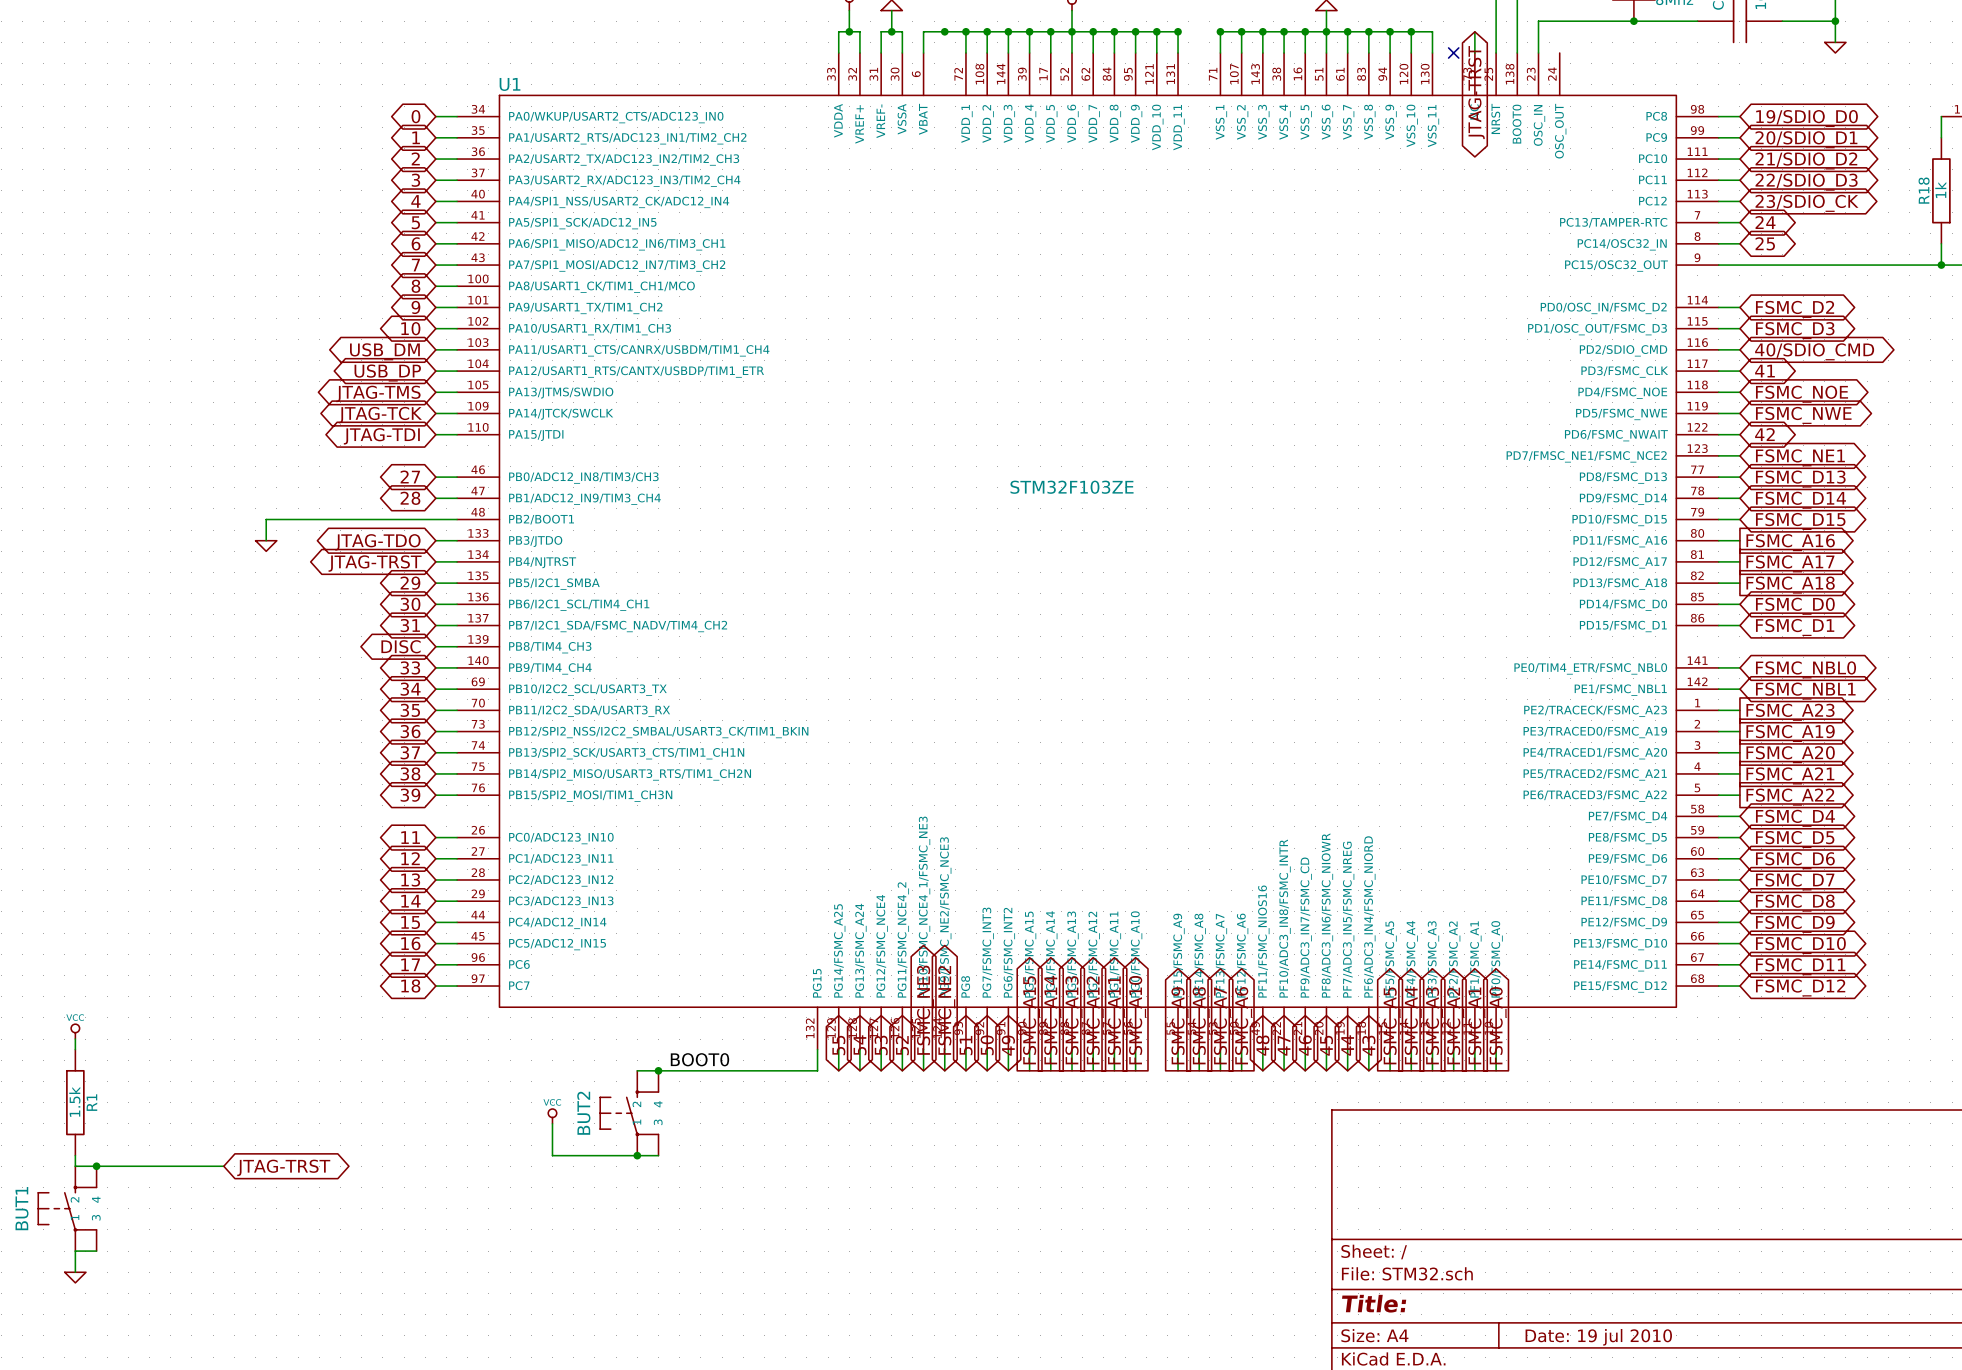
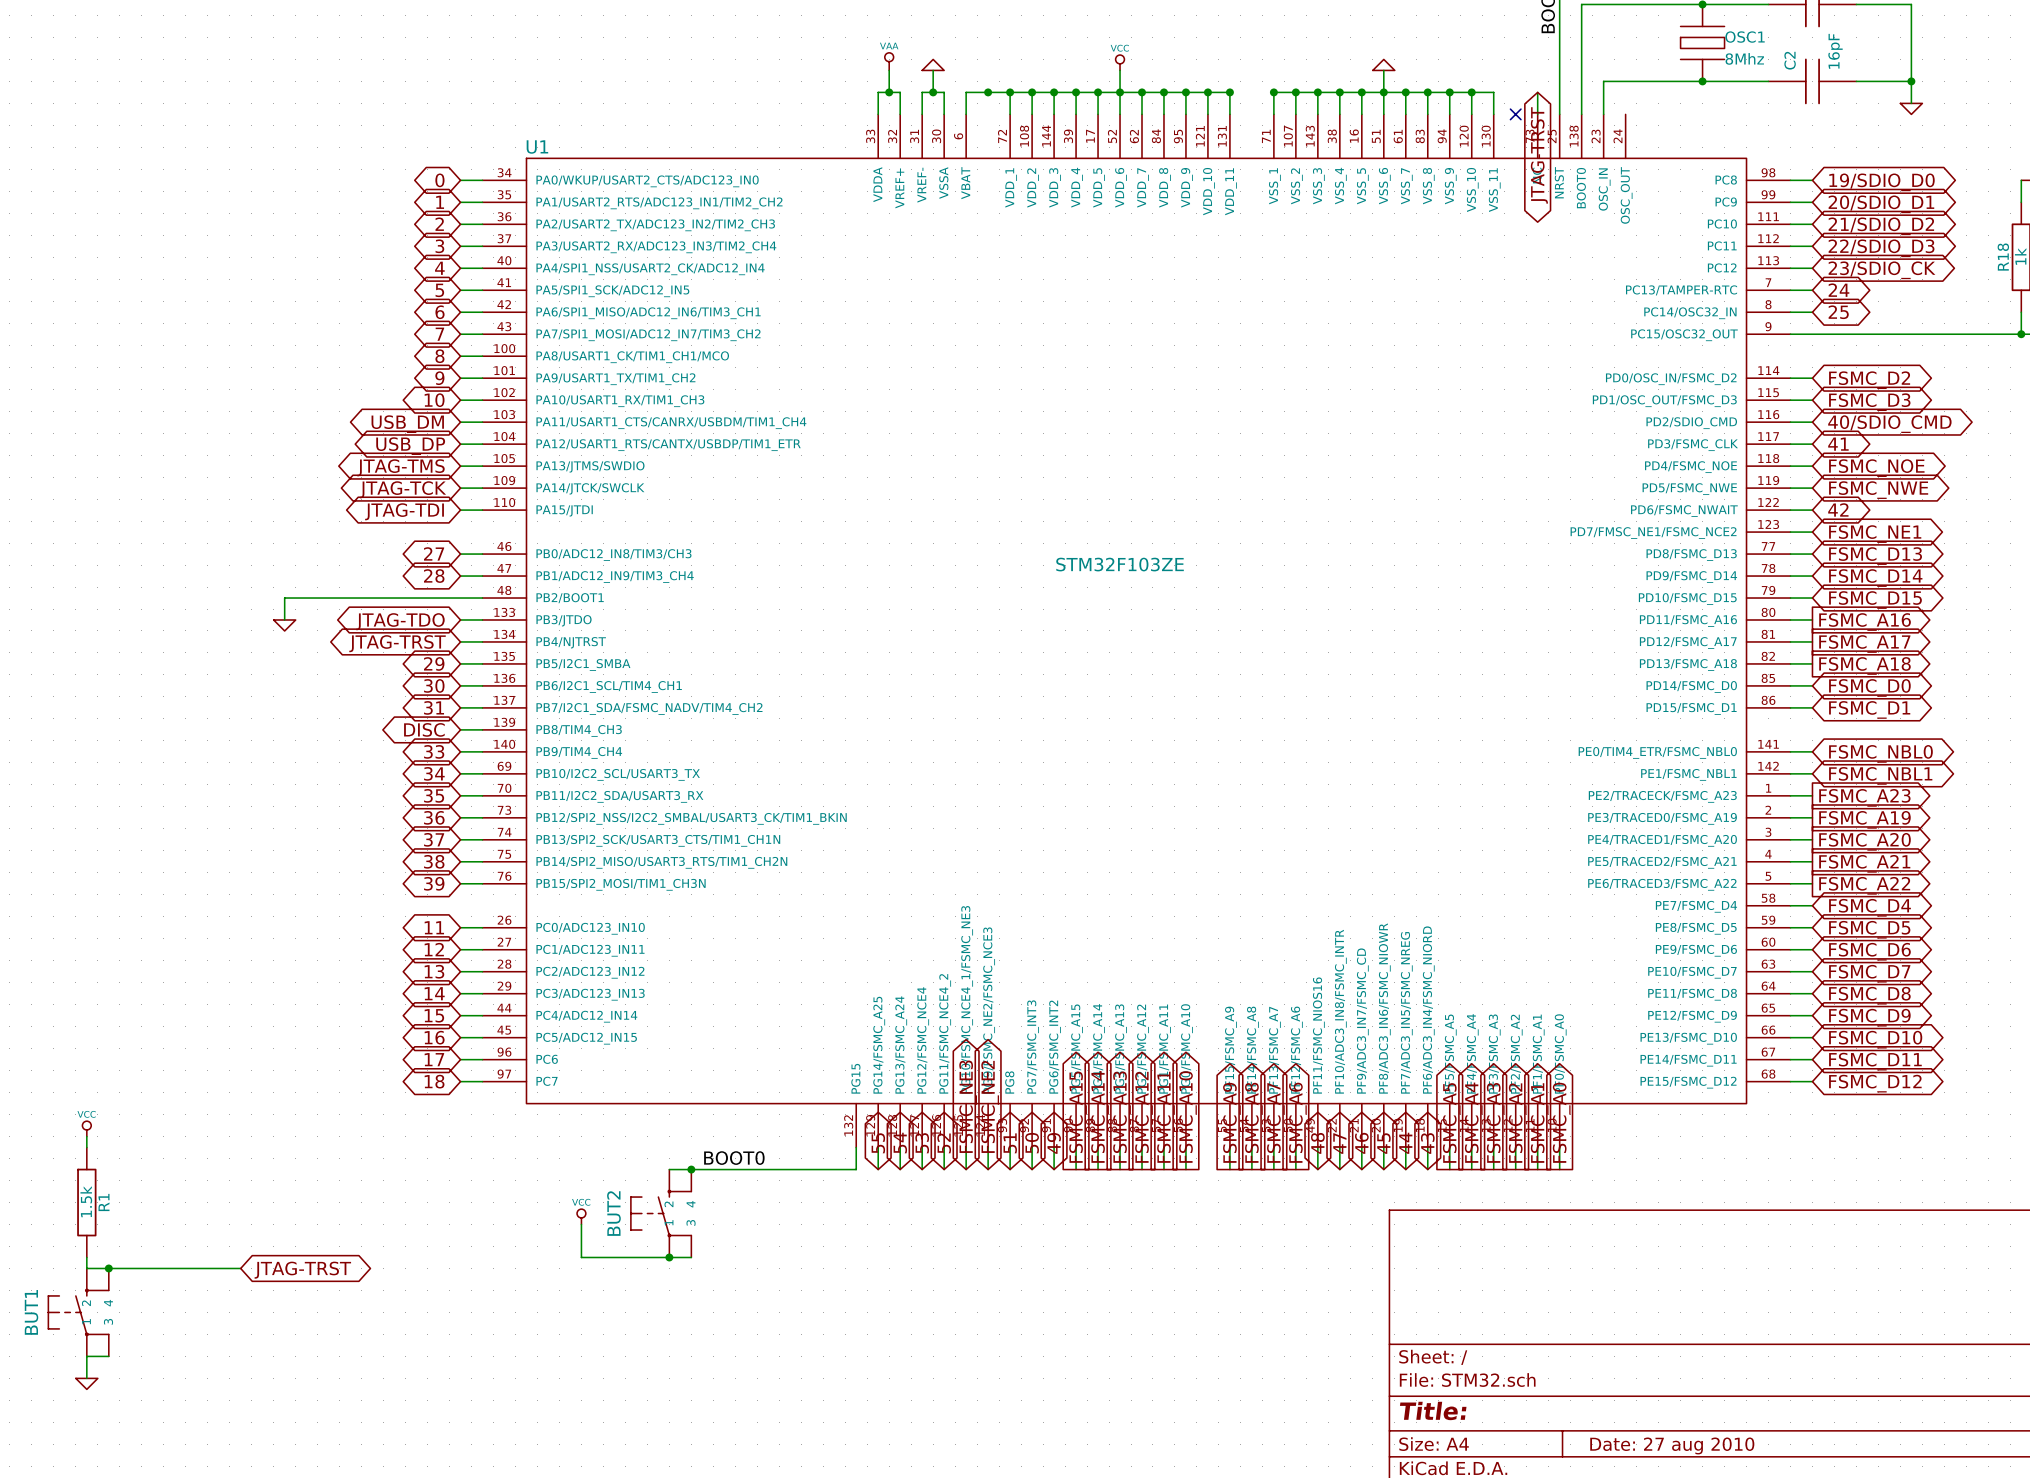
title block: Date: 19 jul 2010 (1598, 1337) -> Date: 27 aug 2010 (1672, 1445)

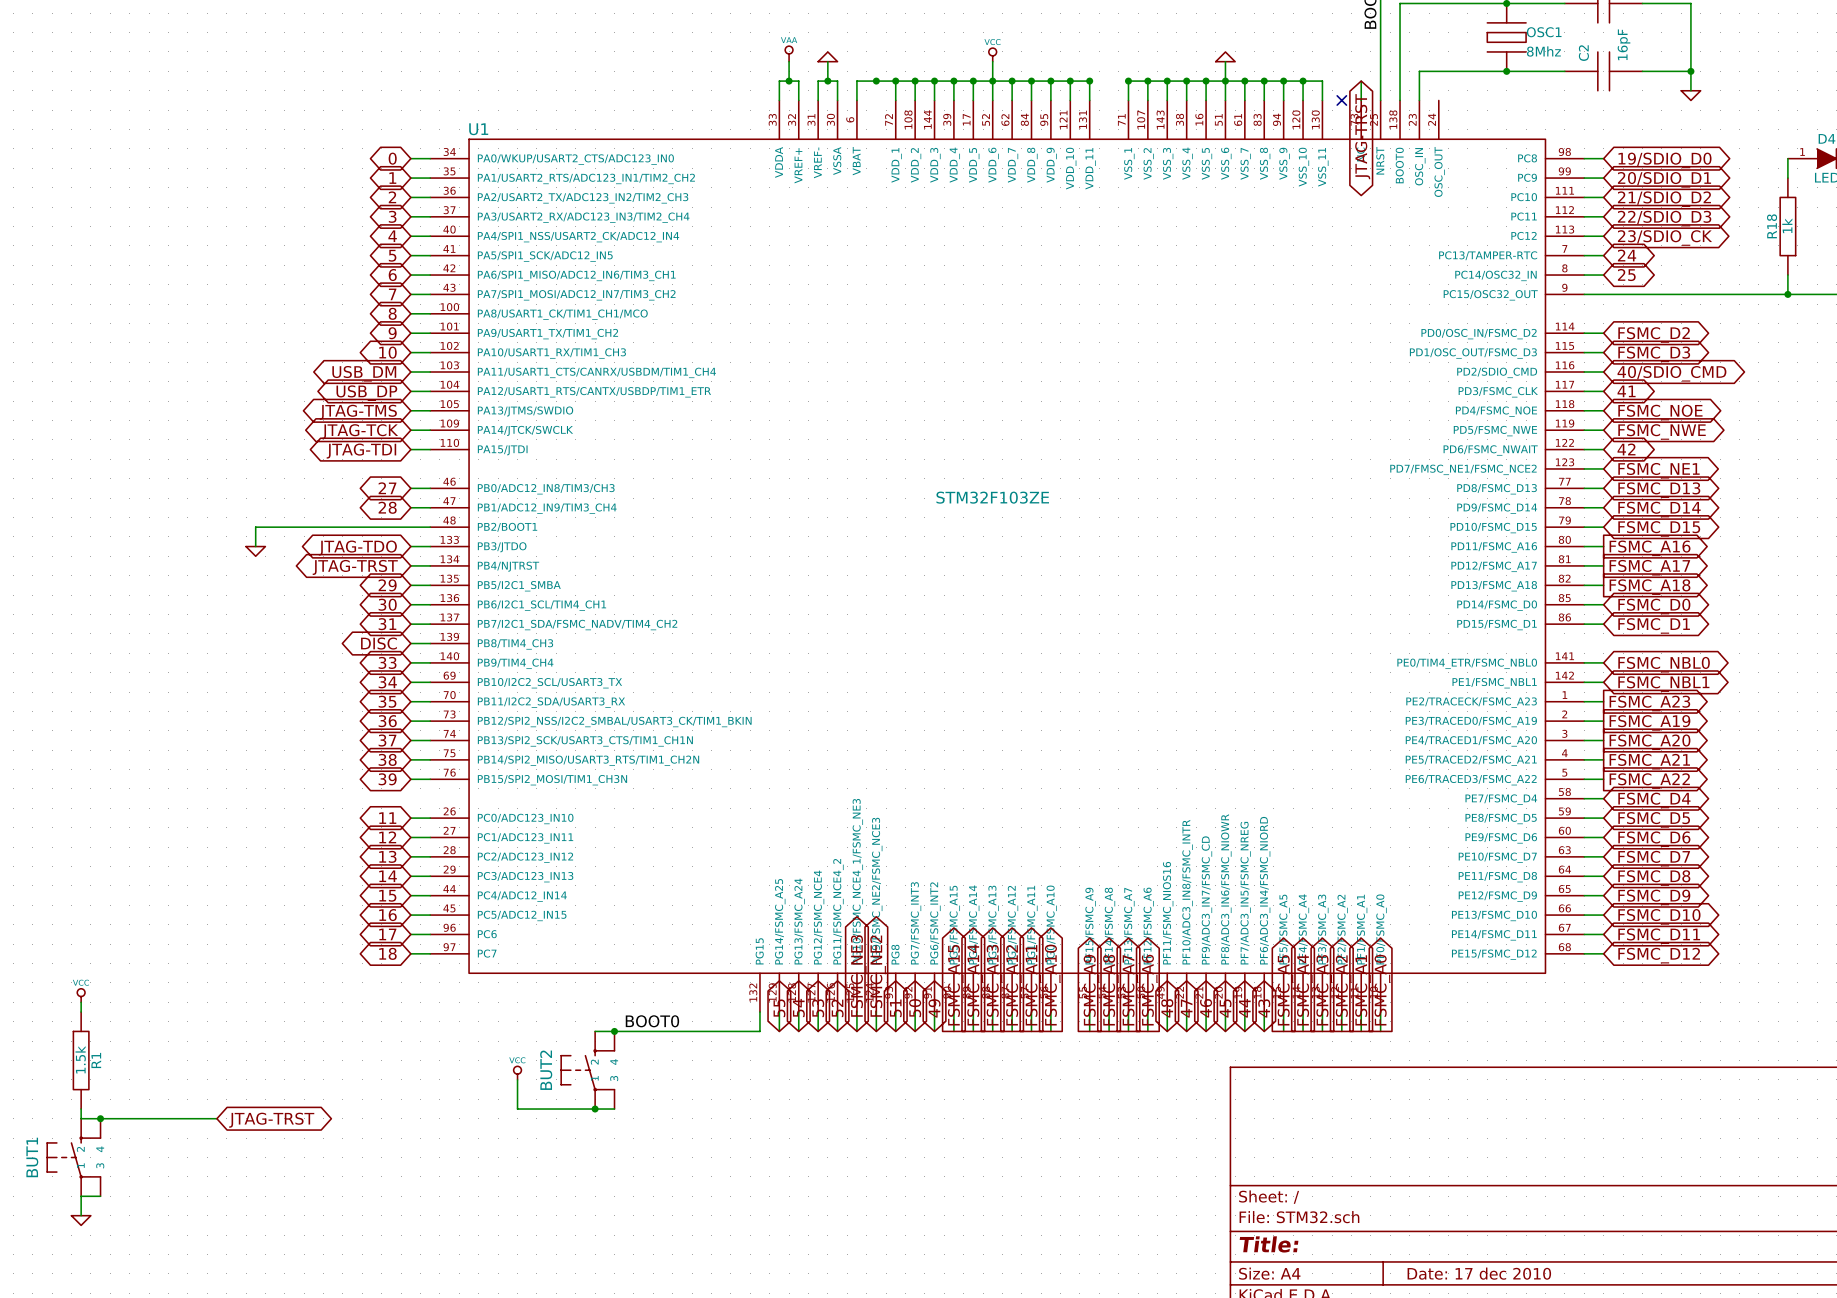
title block: Date: 27 aug 2010 (1672, 1445) -> Date: 17 dec 2010 (1479, 1273)

